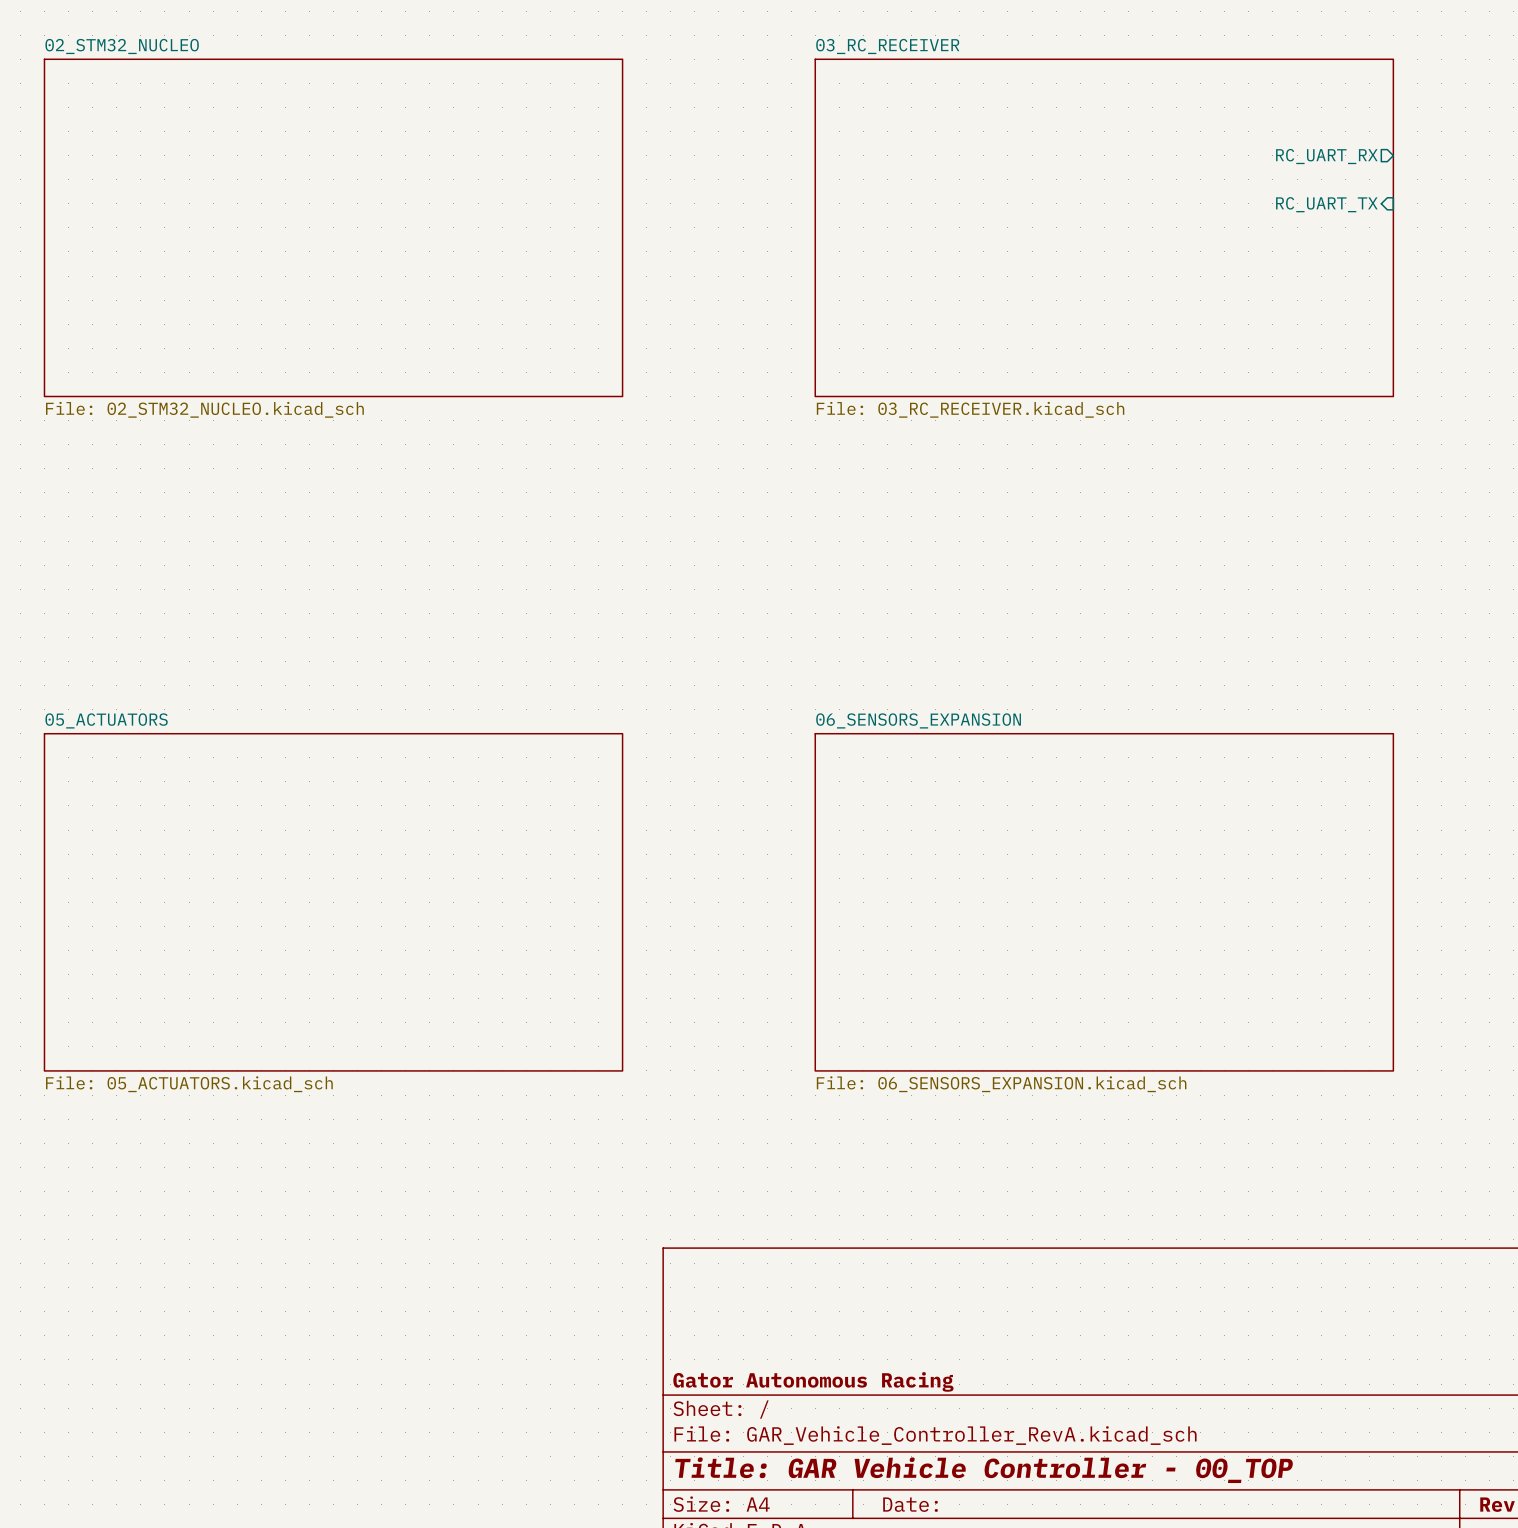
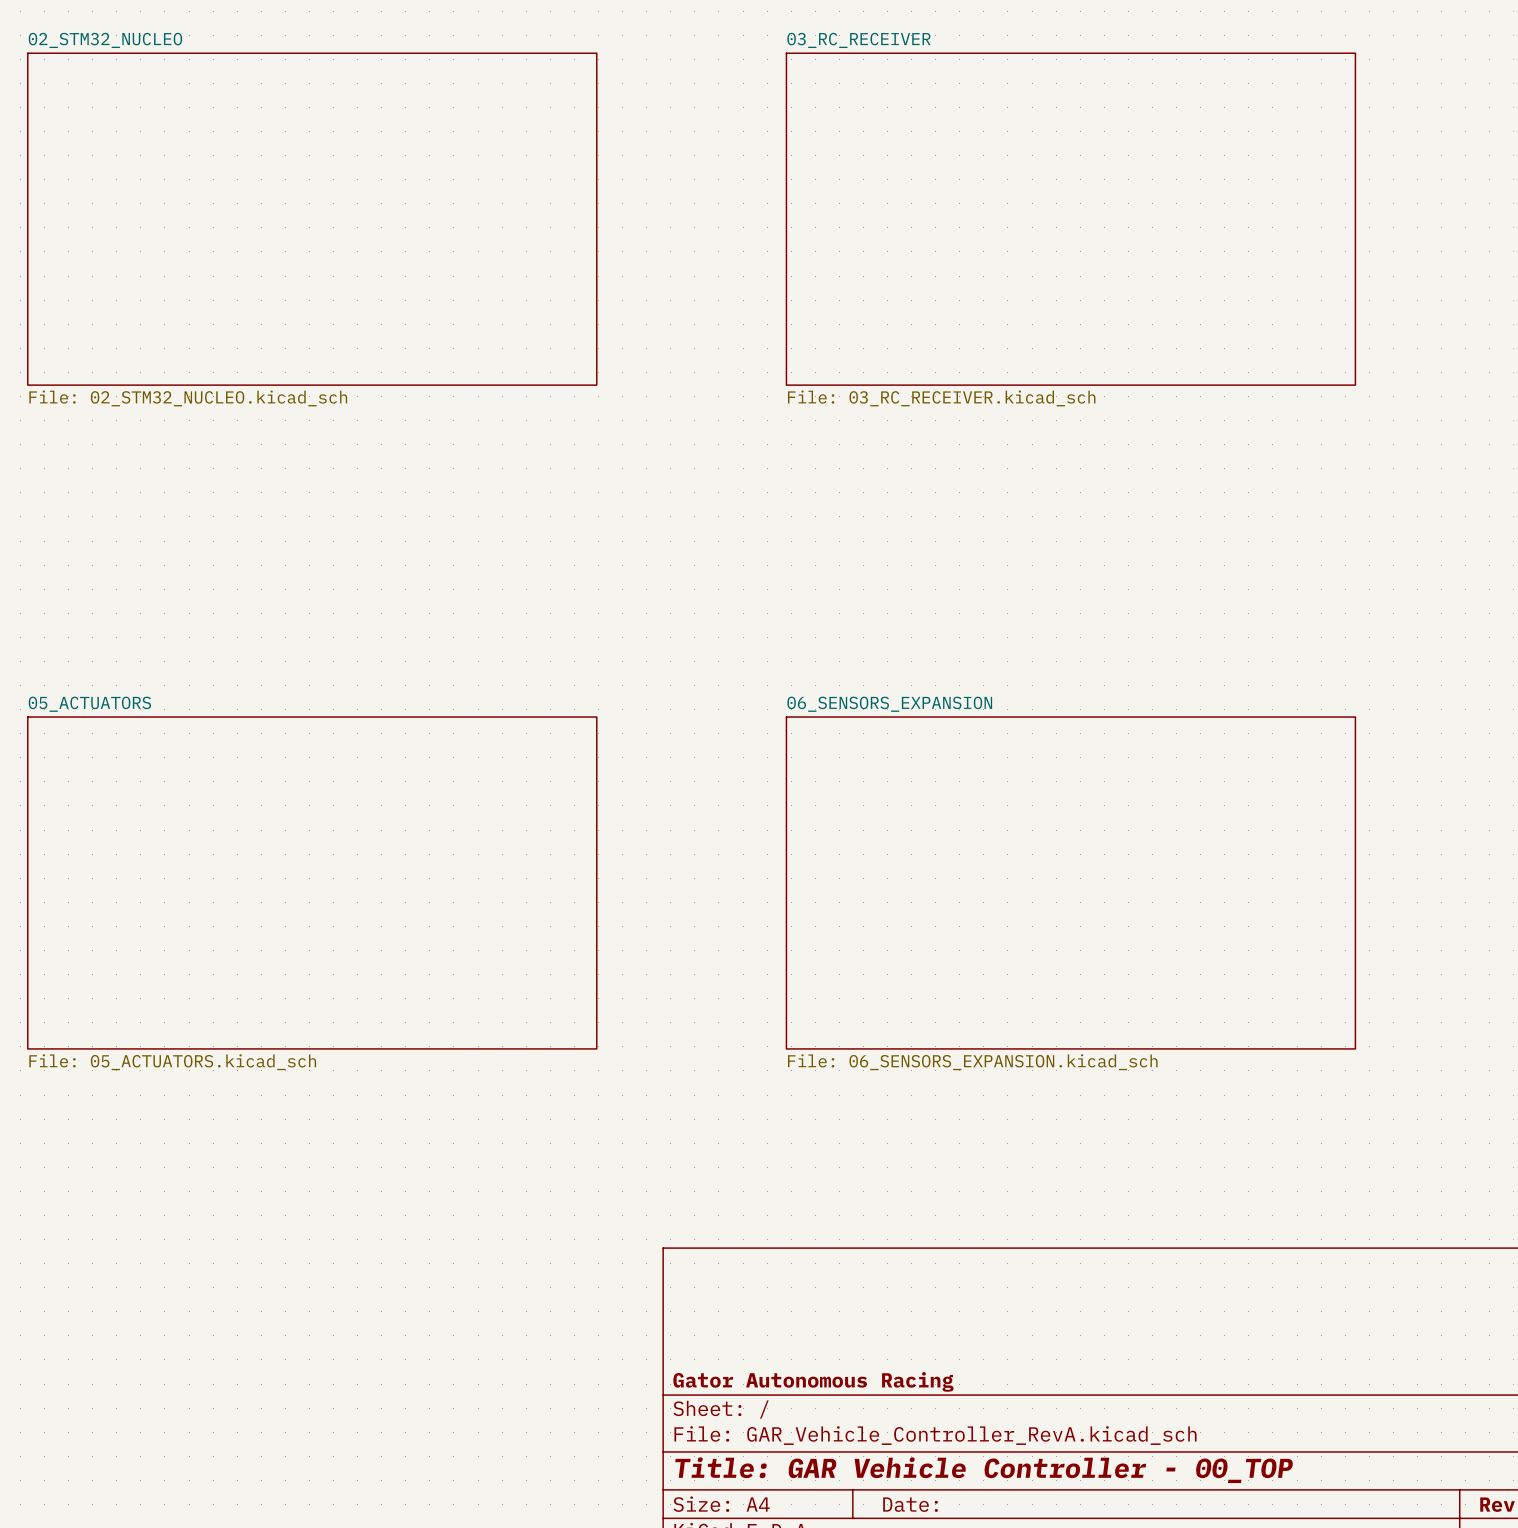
sheet 02_STM32_NUCLEO shape: [43, 58, 624, 398] -> [27, 52, 598, 386]
sheet 03_RC_RECEIVER shape: [814, 58, 1395, 398] -> [785, 52, 1357, 386]
sheet pin: RC_UART_RX (1326, 156) -> none
sheet pin: RC_UART_TX (1326, 204) -> none
sheet 05_ACTUATORS shape: [43, 733, 624, 1072] -> [27, 716, 598, 1050]
sheet 06_SENSORS_EXPANSION shape: [814, 733, 1395, 1072] -> [785, 716, 1357, 1050]

